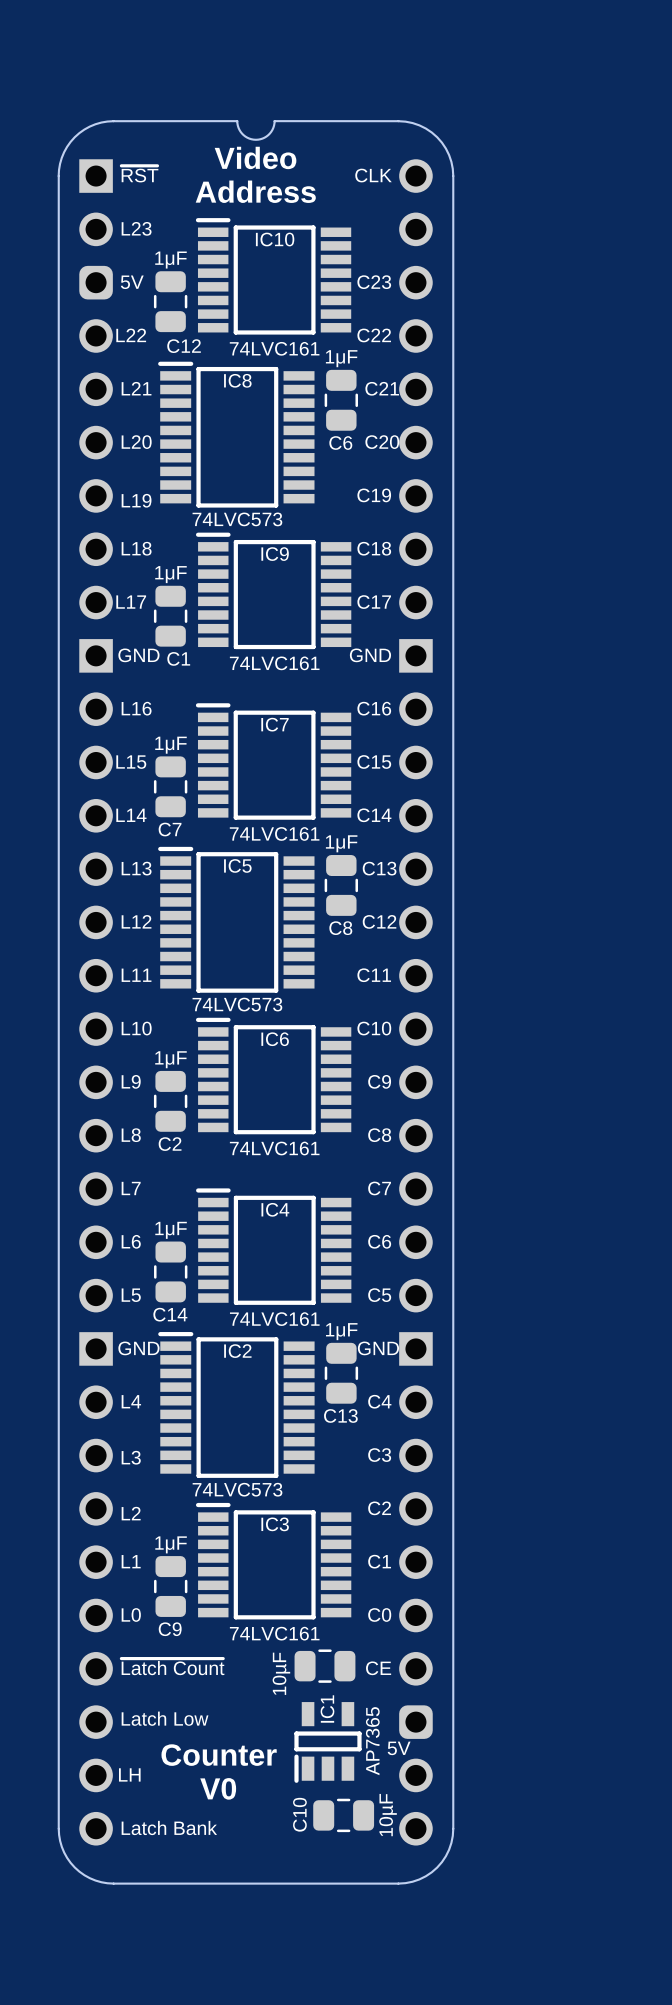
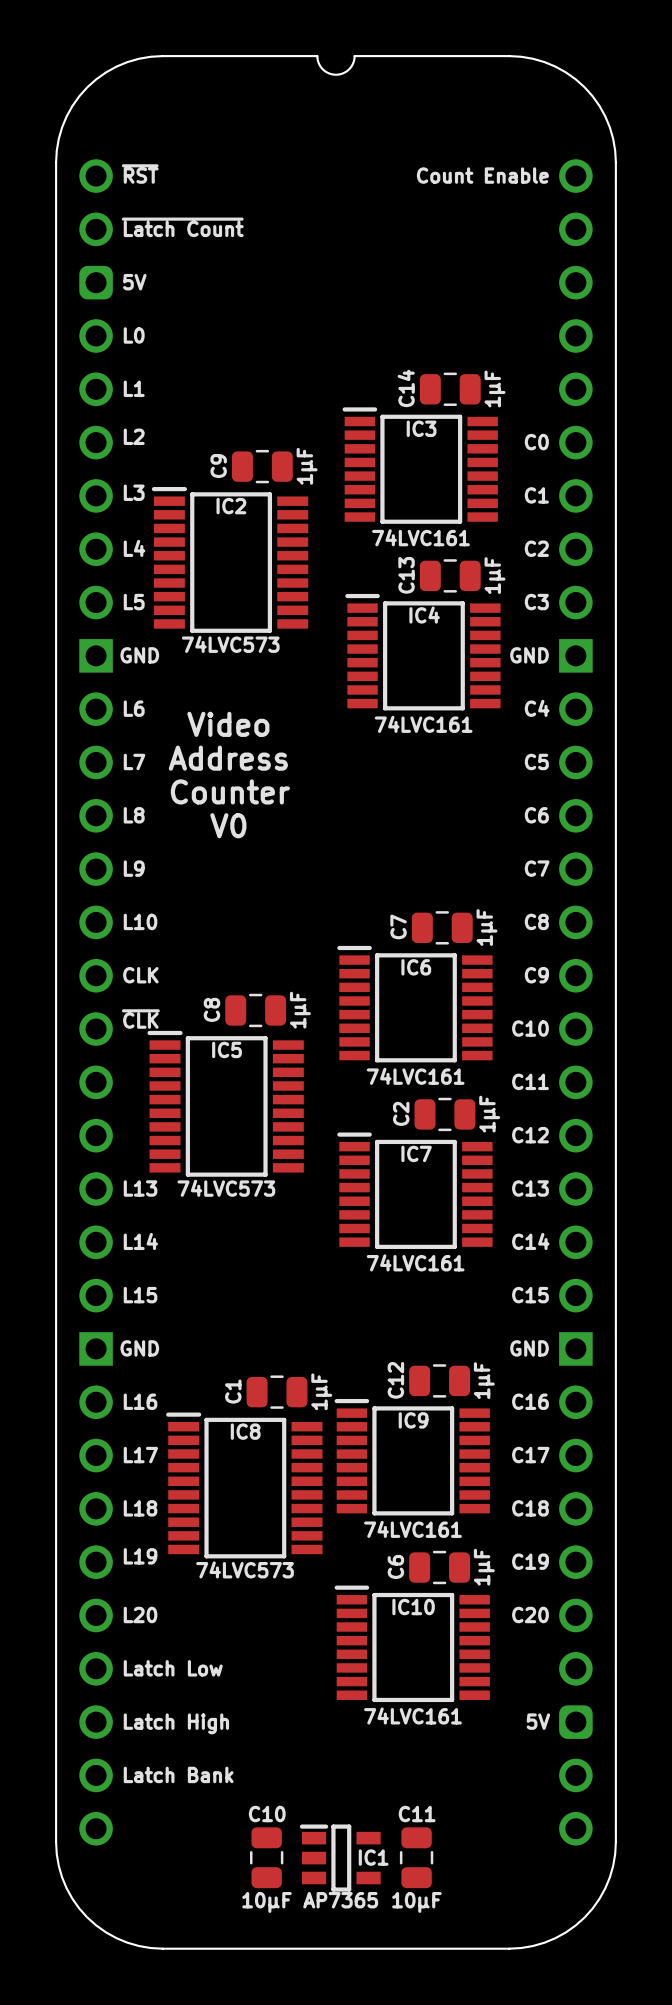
text: Video (255, 157) -> none
text: CLK (373, 175) -> none
text: none -> Count Enable (482, 175)
text: Address (255, 191) -> none
text: L23 (136, 228) -> ~{Latch Count} (182, 227)
IC10 position: (273, 276) -> (412, 1643)
text: C23 (374, 282) -> none
C12 rotation: 0° (170, 301) -> 90° clockwise (439, 1380)
C12 position: (170, 301) -> (439, 1380)
text: L22 (131, 335) -> L0 (134, 335)
text: C22 (374, 335) -> none
text: L21 (136, 388) -> L1 (134, 388)
text: C21 (382, 388) -> none
C6 rotation: 0° (341, 400) -> 90° clockwise (439, 1567)
C6 position: (341, 400) -> (439, 1567)
IC8 position: (236, 434) -> (244, 1485)
text: L20 (136, 442) -> L2 (134, 436)
text: C20 (382, 442) -> none
text: none -> C0 (536, 442)
text: C19 (374, 495) -> none
text: none -> C1 (536, 495)
text: L19 (136, 500) -> L3 (134, 492)
text: L18 (136, 548) -> L4 (134, 548)
text: C18 (374, 548) -> none
text: none -> C2 (536, 548)
IC9 position: (273, 590) -> (412, 1457)
text: L17 (131, 602) -> L5 (134, 602)
text: C17 (374, 602) -> none
text: none -> C3 (536, 602)
C1 rotation: 0° (170, 616) -> 90° clockwise (277, 1392)
C1 position: (170, 616) -> (277, 1392)
text position: GND (370, 655) -> GND (529, 655)
text: L16 (136, 708) -> L6 (134, 708)
text: C16 (374, 708) -> none
text: none -> C4 (537, 708)
text: none -> Video (228, 724)
text: none -> Address (228, 758)
IC7 position: (273, 761) -> (414, 1190)
text: C15 (374, 761) -> none
text: none -> C5 (536, 761)
text: L15 (131, 762) -> L7 (134, 761)
C7 rotation: 0° (170, 786) -> 90° clockwise (442, 927)
C7 position: (170, 786) -> (442, 927)
text: none -> Counter (230, 791)
text: L14 (131, 815) -> none
text position: C14 (374, 815) -> C14 (530, 1241)
text: none -> V0 (228, 825)
text: L13 (136, 868) -> L9 (134, 868)
text position: C13 (379, 868) -> C13 (530, 1188)
C8 rotation: 0° (341, 885) -> 90° clockwise (255, 1010)
C8 position: (341, 885) -> (255, 1010)
IC5 position: (236, 919) -> (225, 1103)
text: L12 (136, 921) -> L10 (140, 921)
text position: C12 (379, 921) -> C12 (530, 1135)
text: L11 (136, 975) -> CLK (140, 975)
text position: C11 (374, 975) -> C11 (530, 1081)
part: (255, 1002) -> none
part: none -> (335, 1002)
text: L10 (136, 1028) -> ~{CLK} (140, 1019)
text position: C10 (374, 1028) -> C10 (530, 1028)
IC6 position: (273, 1076) -> (414, 1004)
text: L9 (131, 1081) -> none
text position: C9 (379, 1081) -> C9 (536, 975)
C2 rotation: 0° (170, 1101) -> 90° clockwise (444, 1114)
C2 position: (170, 1101) -> (444, 1114)
text position: L8 (131, 1135) -> L8 (134, 815)
text position: C8 (379, 1135) -> C8 (536, 921)
text: L7 (131, 1188) -> L13 (140, 1188)
text position: C7 (379, 1188) -> C7 (537, 868)
text: L6 (131, 1241) -> L14 (140, 1241)
text position: C6 (379, 1241) -> C6 (536, 815)
IC4 position: (273, 1246) -> (422, 652)
C14 rotation: 0° (170, 1271) -> 90° clockwise (450, 389)
C14 position: (170, 1271) -> (450, 389)
text: L5 (131, 1295) -> L15 (140, 1295)
text: C5 (379, 1295) -> none
text: none -> C15 (530, 1295)
text position: GND (378, 1348) -> GND (529, 1348)
C13 rotation: 0° (341, 1373) -> 90° clockwise (450, 575)
C13 position: (341, 1373) -> (450, 575)
text: L4 (131, 1401) -> L16 (140, 1401)
text: C4 (379, 1401) -> none
text: none -> C16 (530, 1401)
IC2 position: (236, 1404) -> (230, 559)
text: C3 (379, 1455) -> none
text: none -> C17 (530, 1455)
text: L3 (131, 1457) -> L17 (140, 1455)
text: C2 (379, 1508) -> none
text: none -> C18 (530, 1508)
text: L2 (131, 1513) -> L18 (140, 1508)
text: L1 (131, 1561) -> L19 (140, 1556)
IC3 position: (273, 1561) -> (420, 465)
text: C1 (379, 1561) -> none
text: none -> C19 (530, 1561)
C9 rotation: 0° (170, 1586) -> 90° clockwise (262, 466)
C9 position: (170, 1586) -> (262, 466)
text: L0 (131, 1614) -> L20 (140, 1615)
text: C0 (379, 1614) -> none
text: none -> C20 (530, 1615)
text: ~{Latch Count} (172, 1666) -> Latch Low (173, 1668)
part: 10µF (324, 1666) -> none
text: CE (378, 1668) -> none
IC1 footprint: [294, 1702, 362, 1783] -> [299, 1824, 381, 1892]
IC1 name position: IC1 (327, 1709) -> IC1 (373, 1857)
text: Latch Low (165, 1718) -> Latch High (176, 1723)
text position: 5V (399, 1748) -> 5V (538, 1721)
text: Counter (219, 1755) -> none
text: LH (129, 1774) -> none
text: V0 (218, 1788) -> none
C10 rotation: 0° (343, 1815) -> 90° clockwise (266, 1857)
C10 position: (343, 1815) -> (266, 1857)
text position: Latch Bank (169, 1827) -> Latch Bank (178, 1774)
C11: none -> 10µF (416, 1857)

